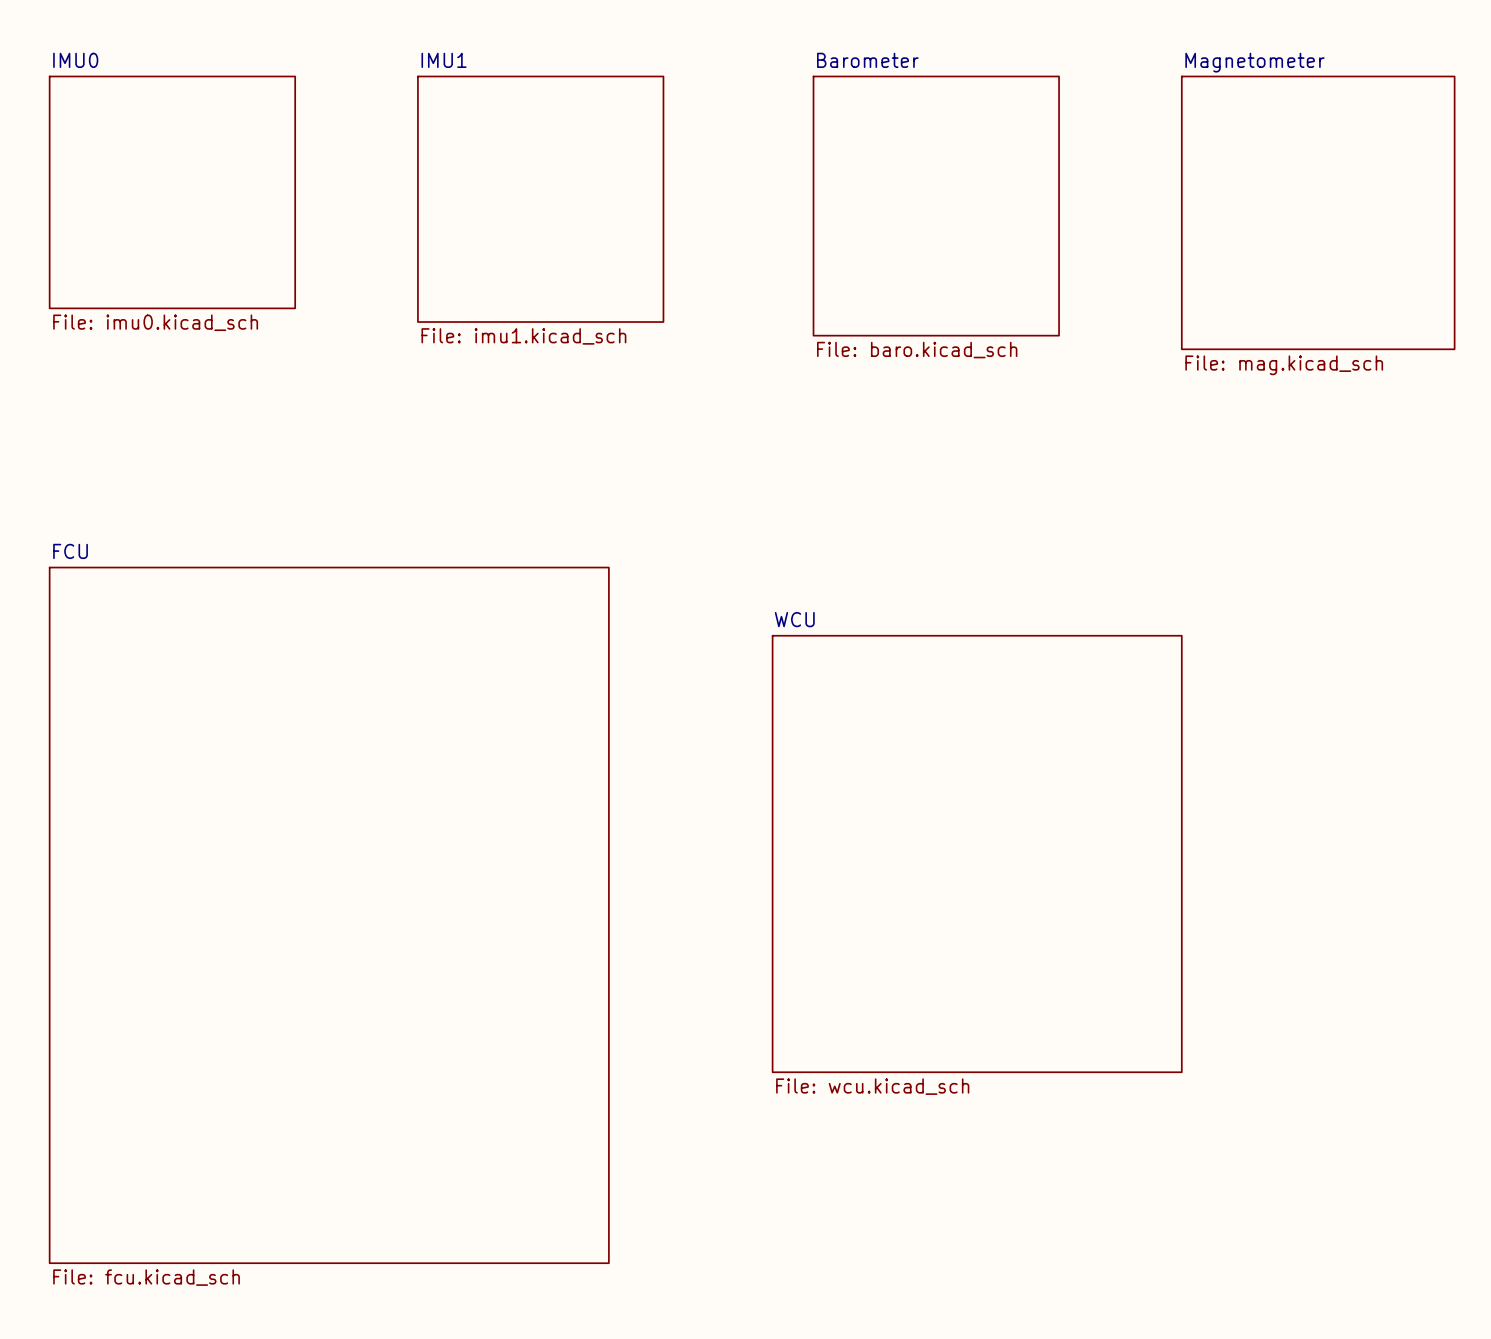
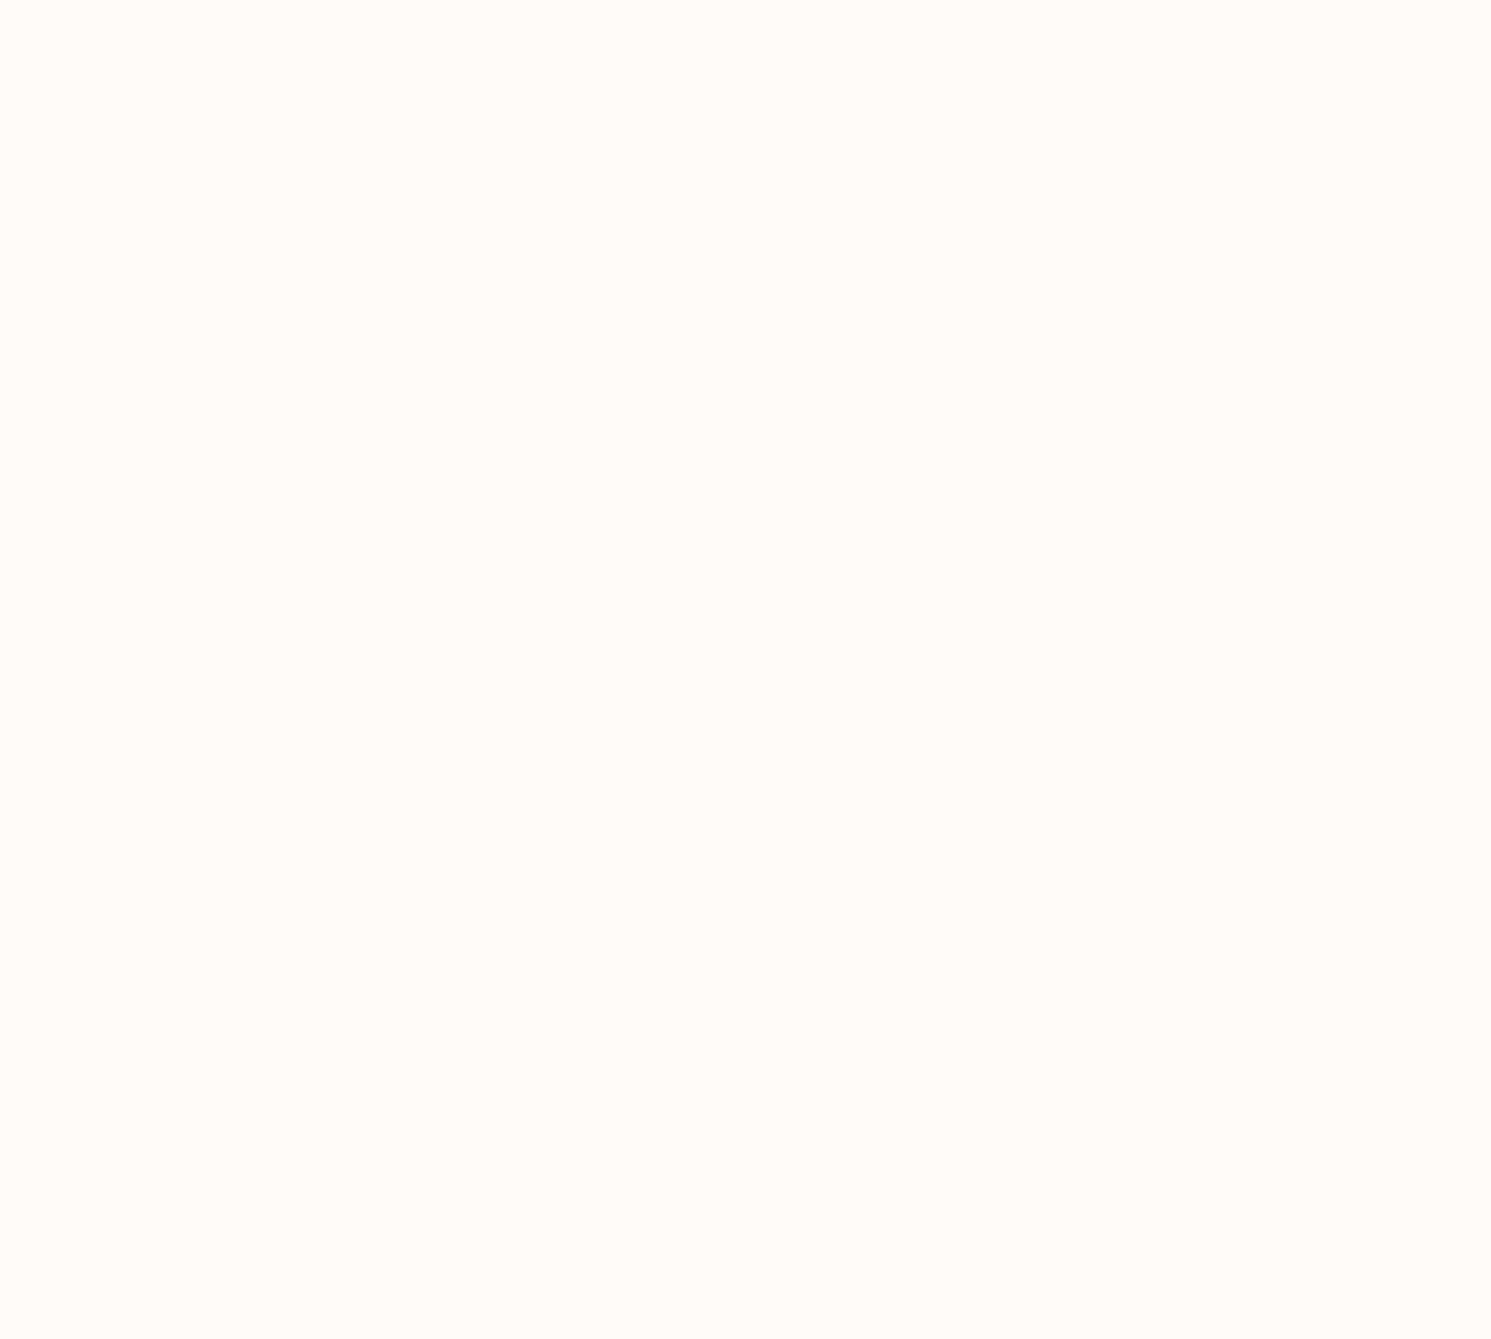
sheet IMU0: File: imu0.kicad_sch (172, 192) -> none
sheet IMU1: File: imu1.kicad_sch (540, 199) -> none
sheet Barometer: File: baro.kicad_sch (936, 206) -> none
sheet Magnetometer: File: mag.kicad_sch (1318, 212) -> none
sheet WCU: File: wcu.kicad_sch (977, 853) -> none
sheet FCU: File: fcu.kicad_sch (329, 915) -> none

